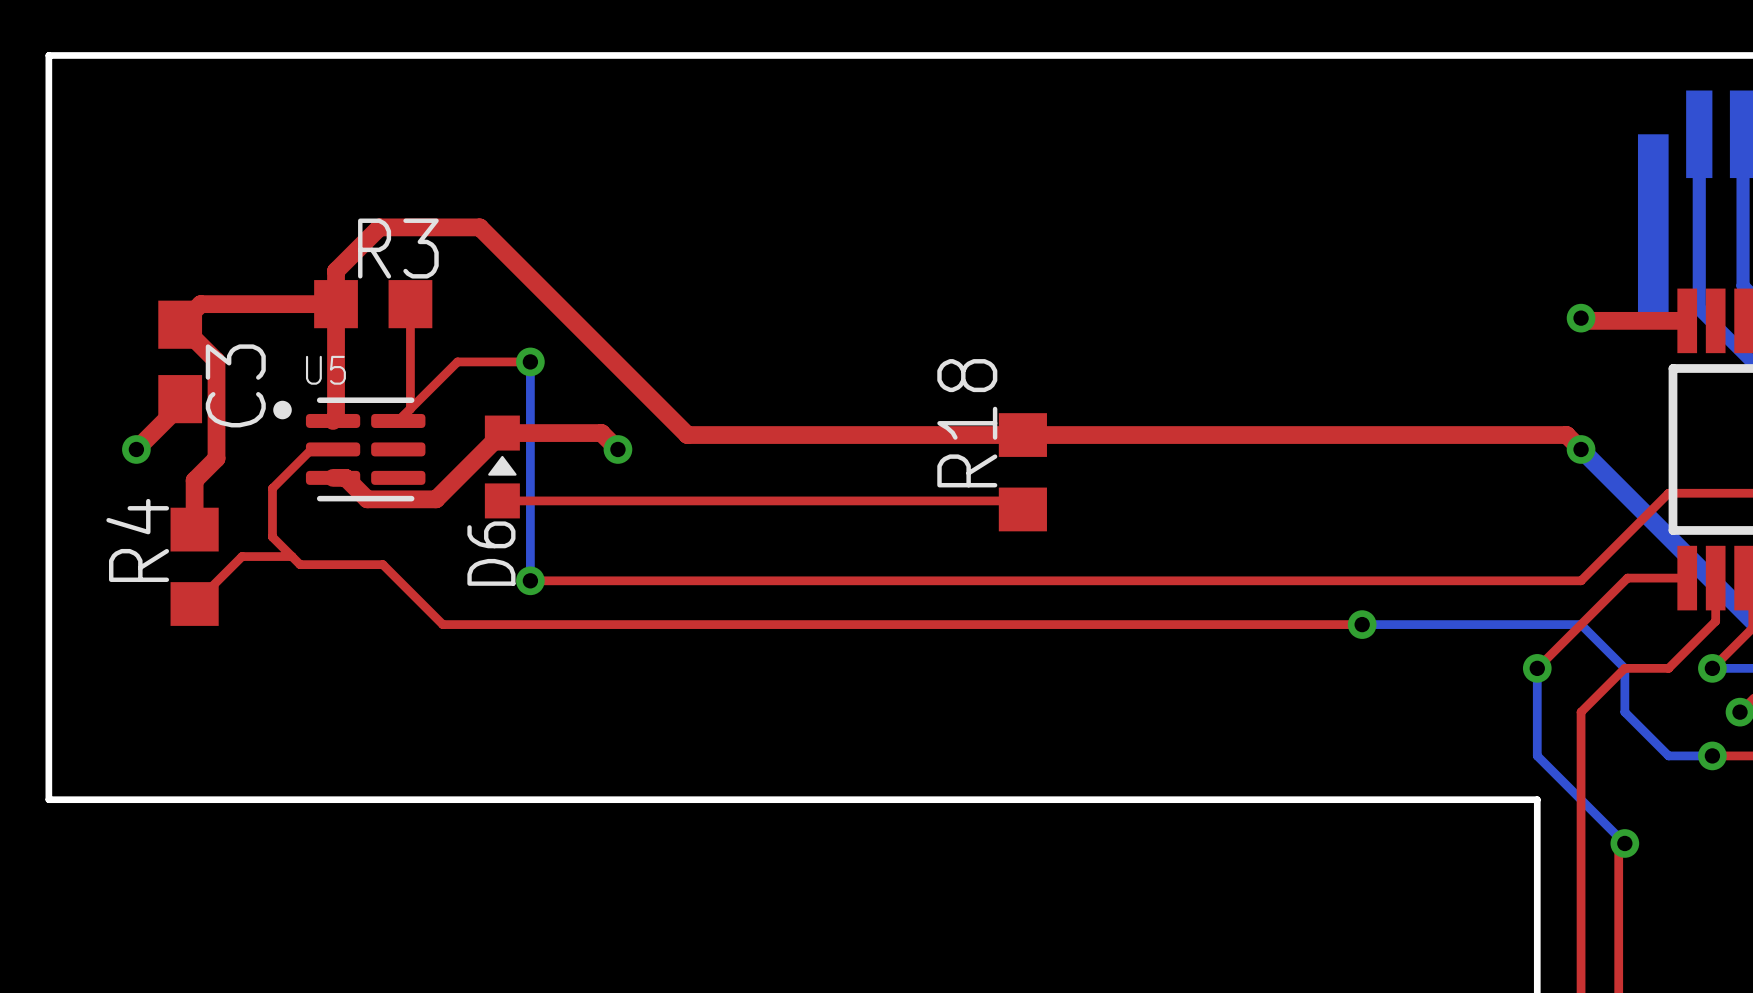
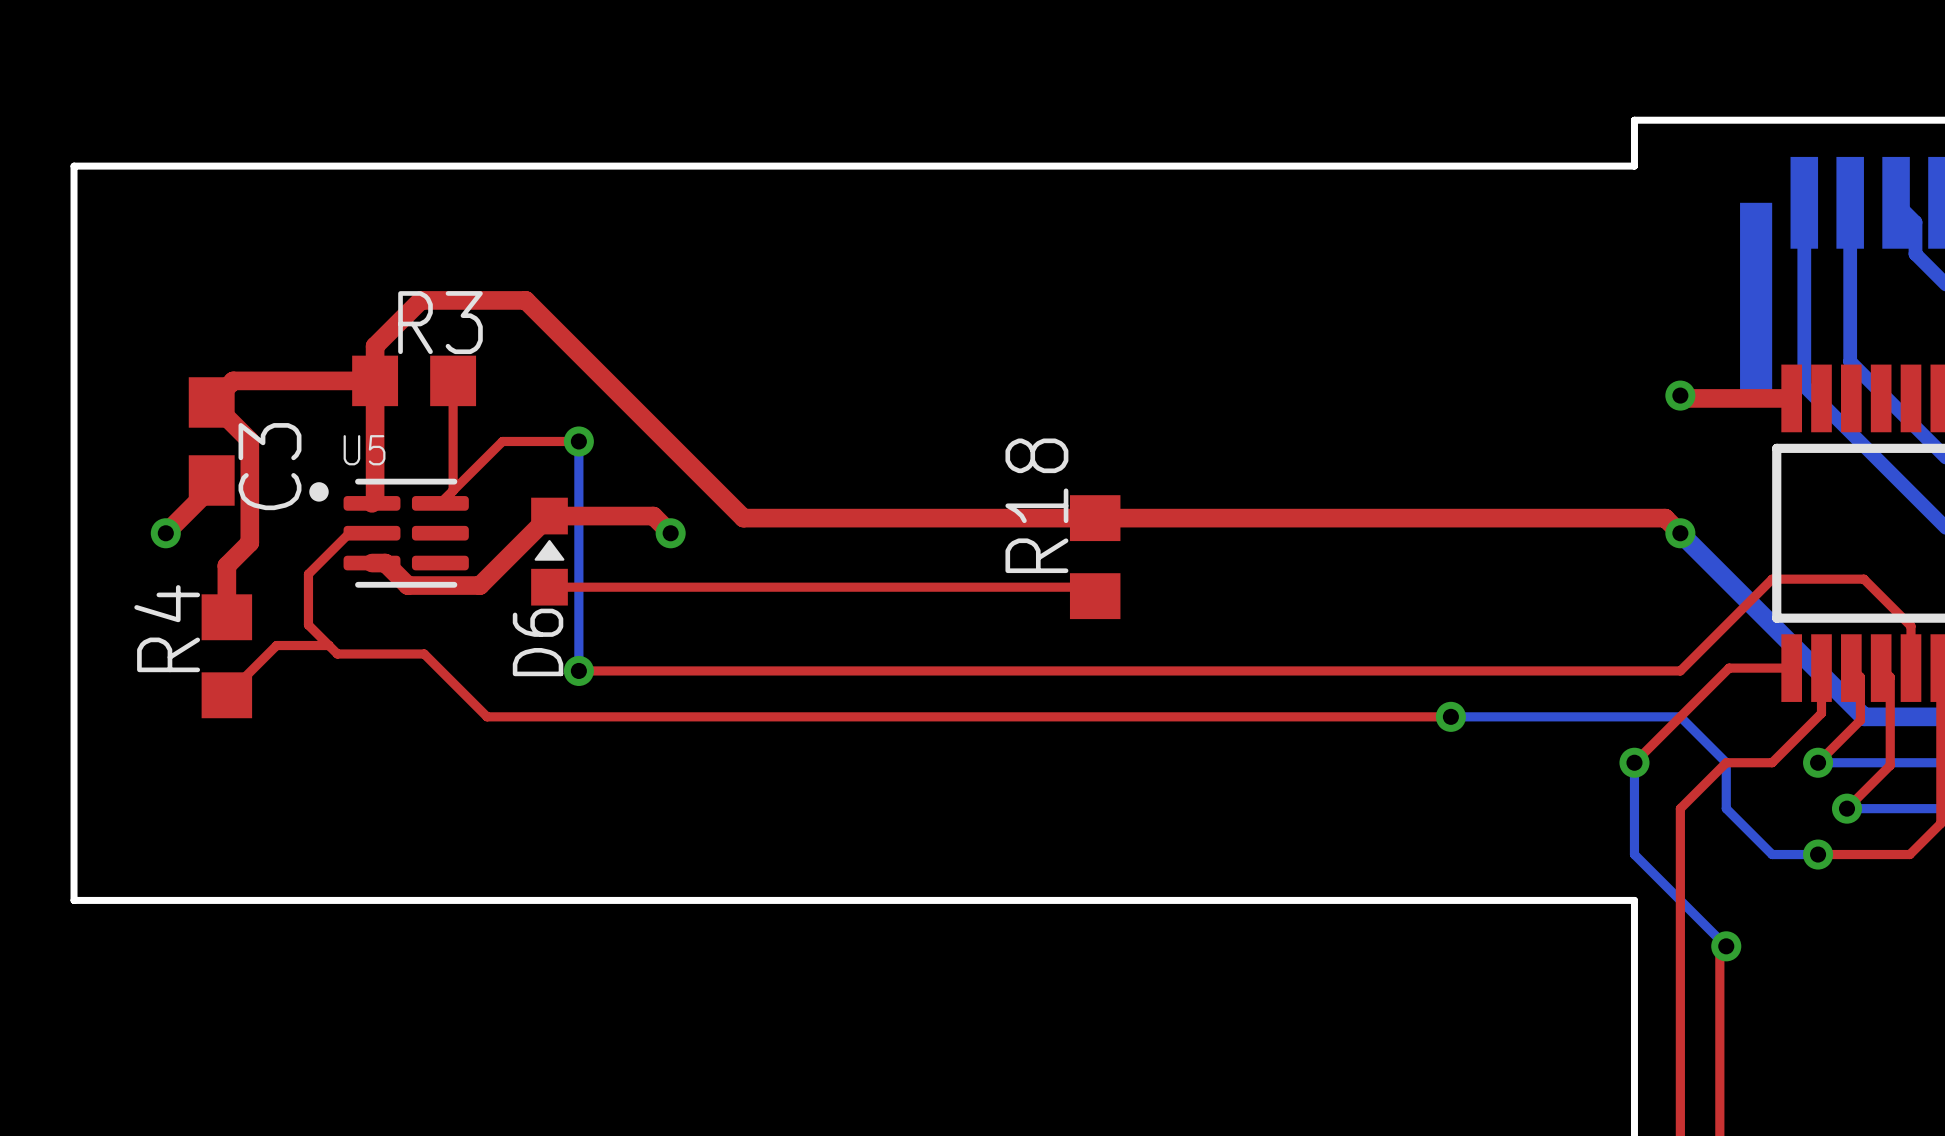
board edge: (1537, 55) (48, 55) (48, 99) -> (1634, 120) (1634, 166) (74, 166)

